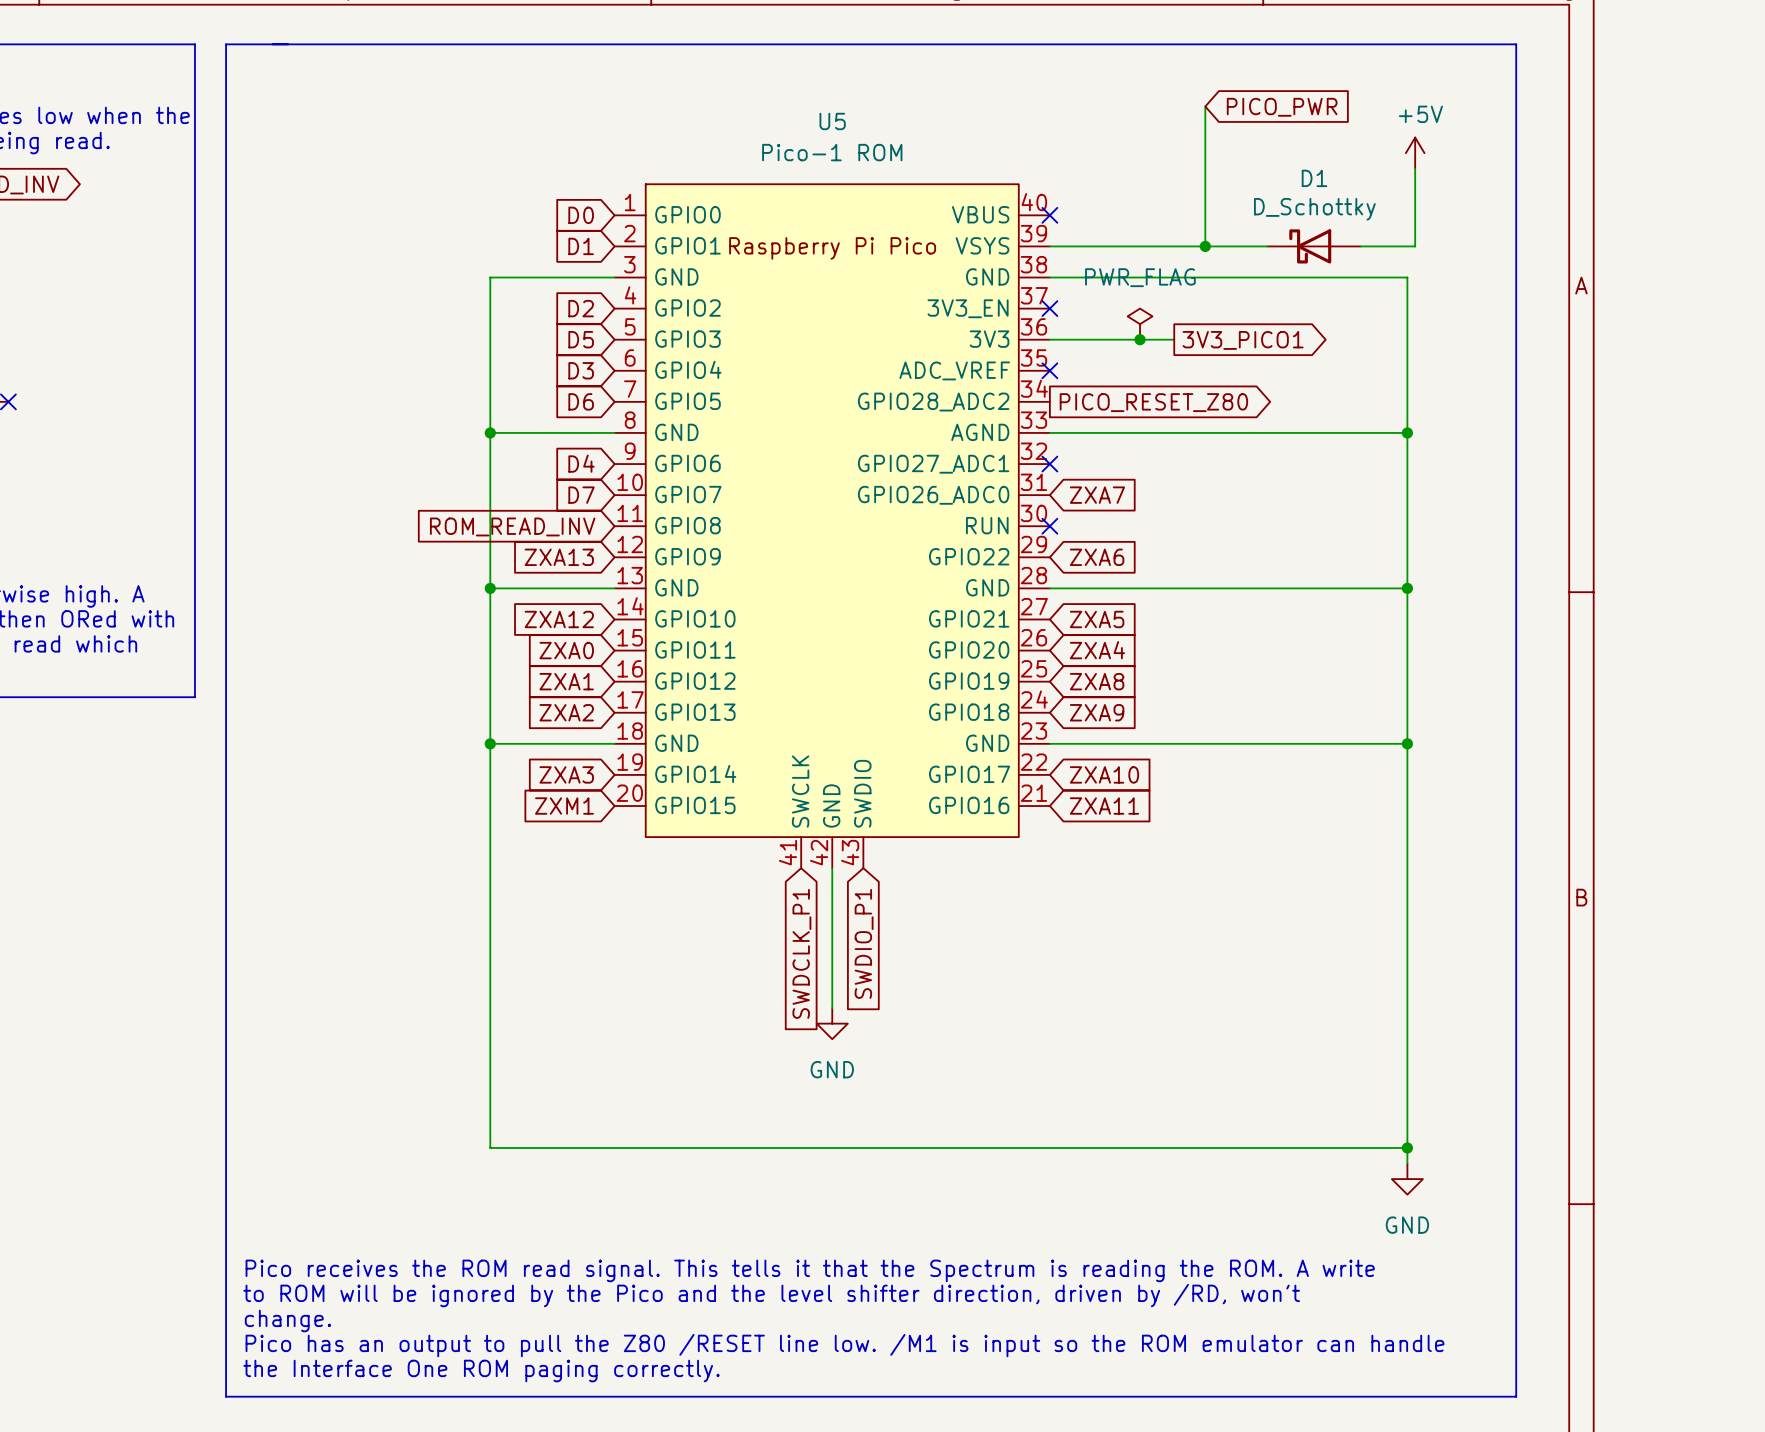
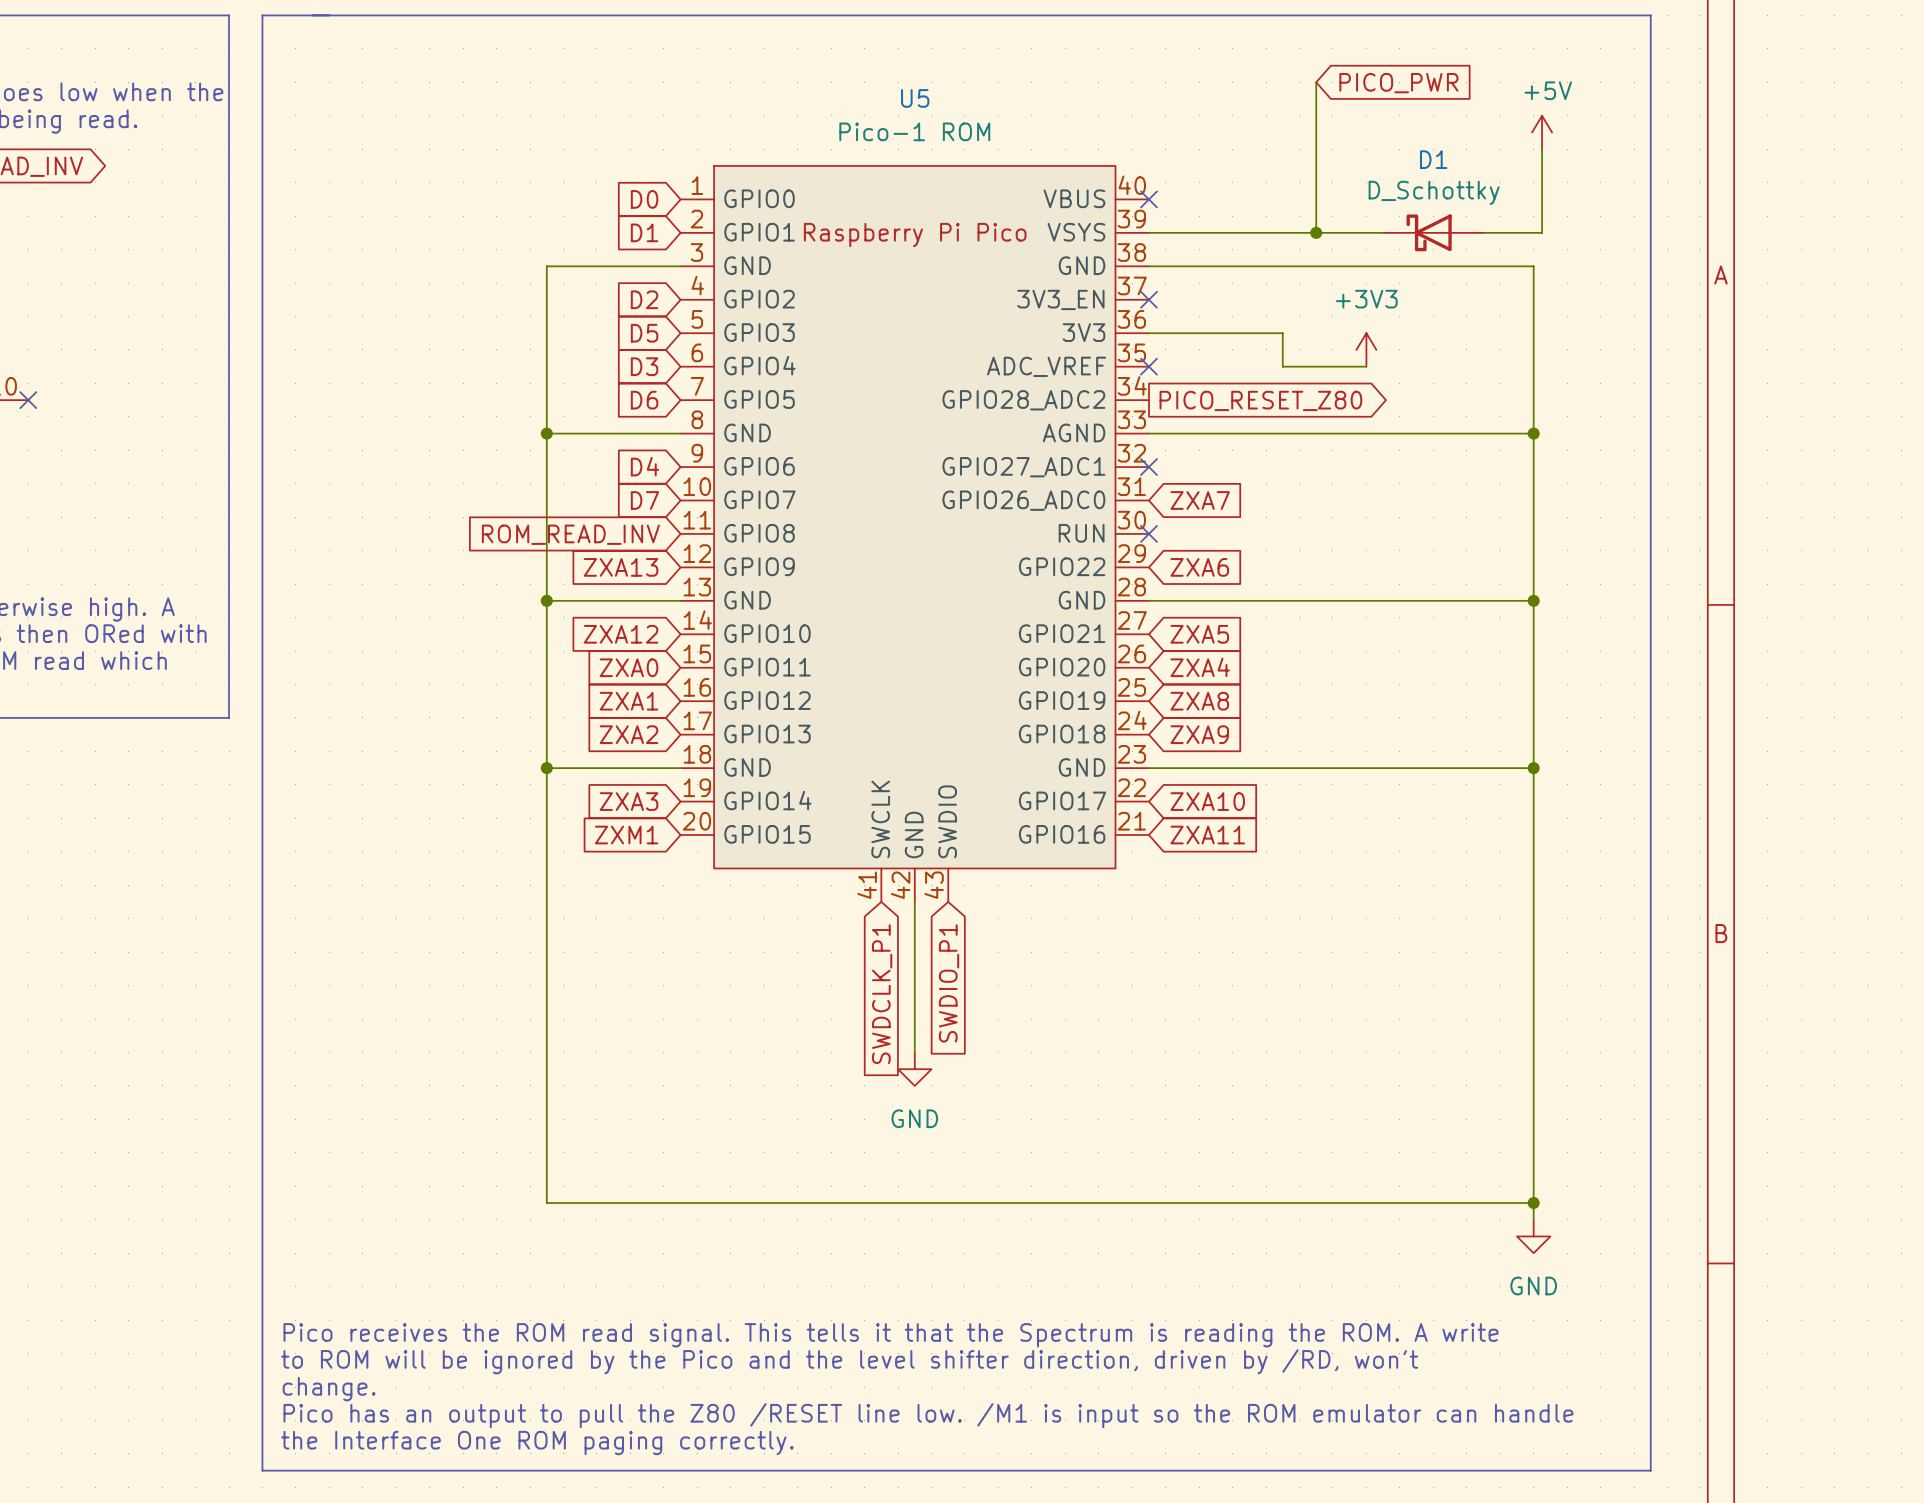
power symbol: PWR_FLAG (1140, 324) -> none
junction: (1140, 339) -> none
wire: none -> (1282, 333) (1282, 366) (1366, 366)
global label: 3V3_PICO1 (1243, 340) -> none
power symbol: none -> +3V3 (1366, 349)

